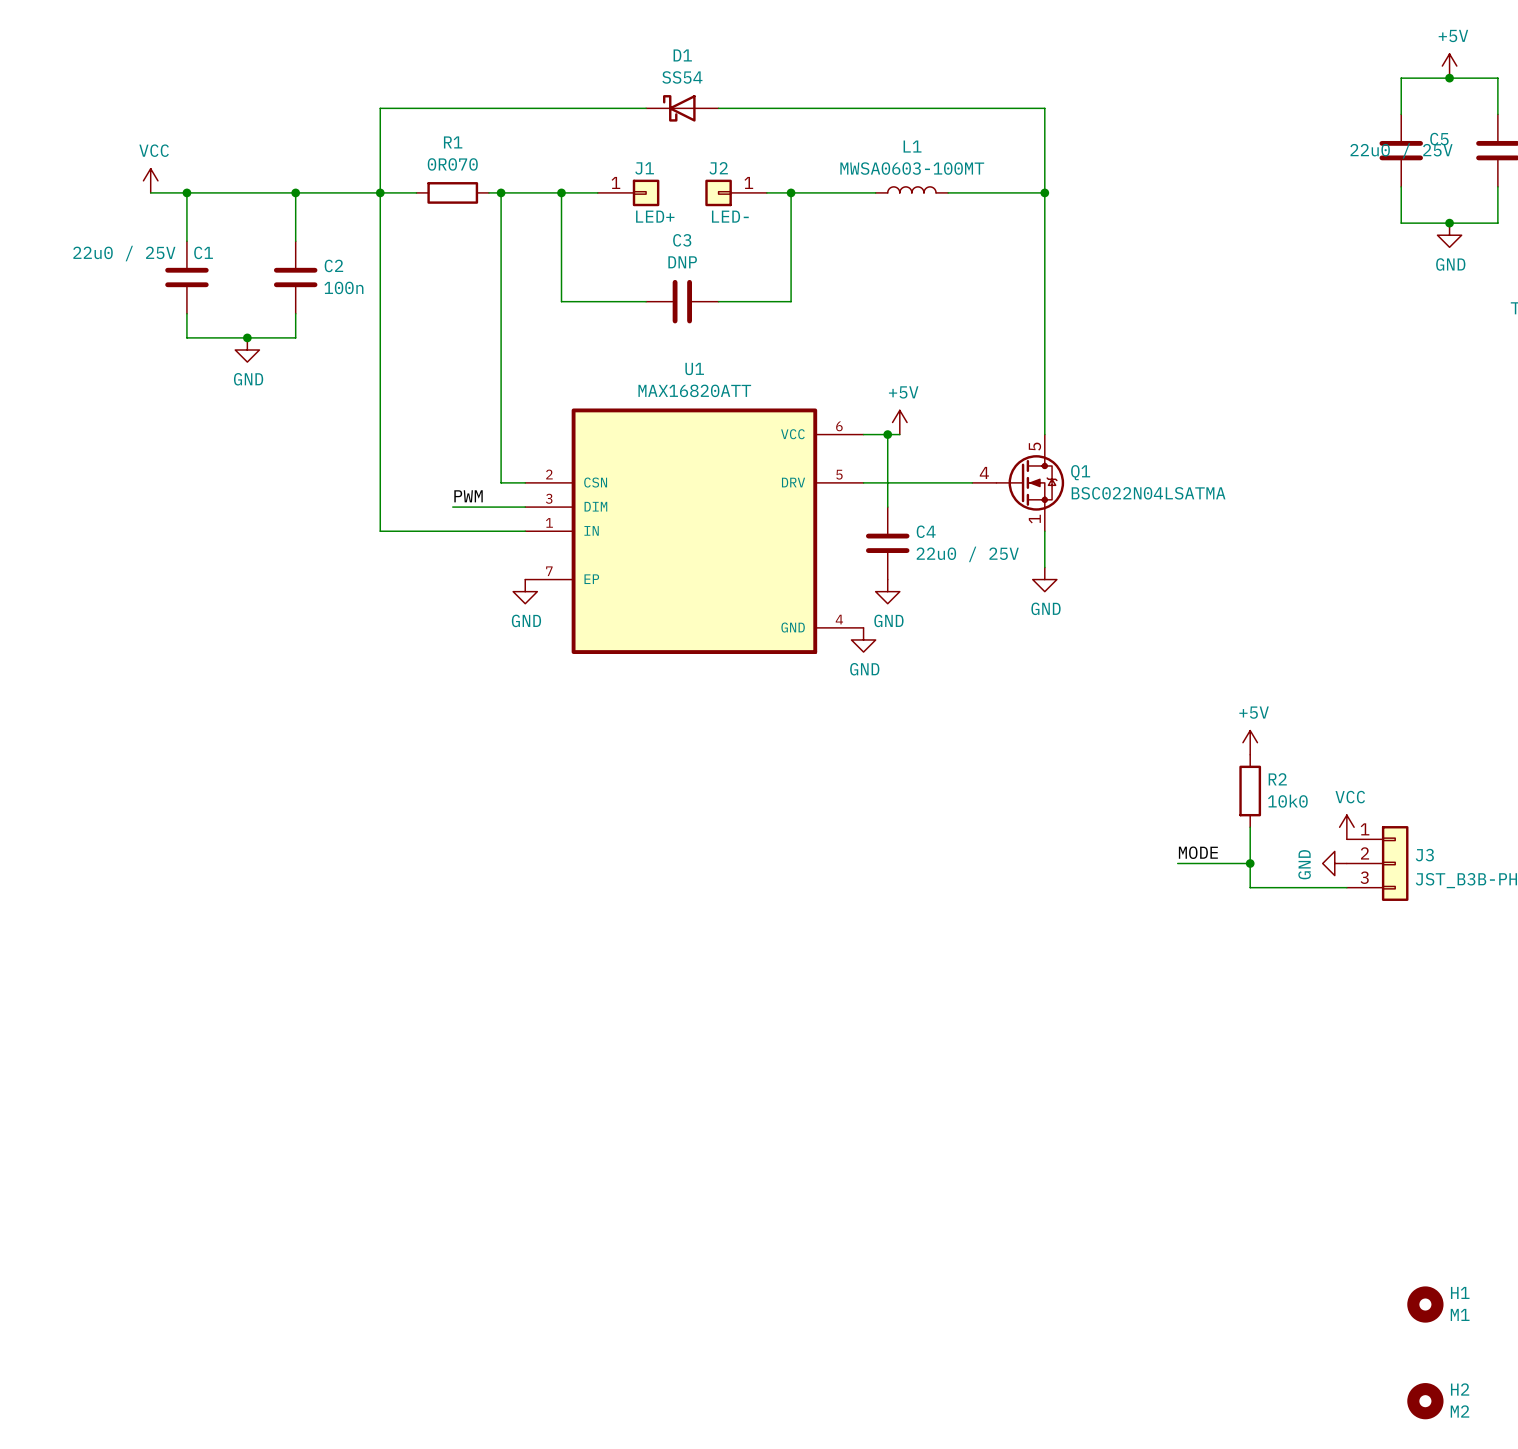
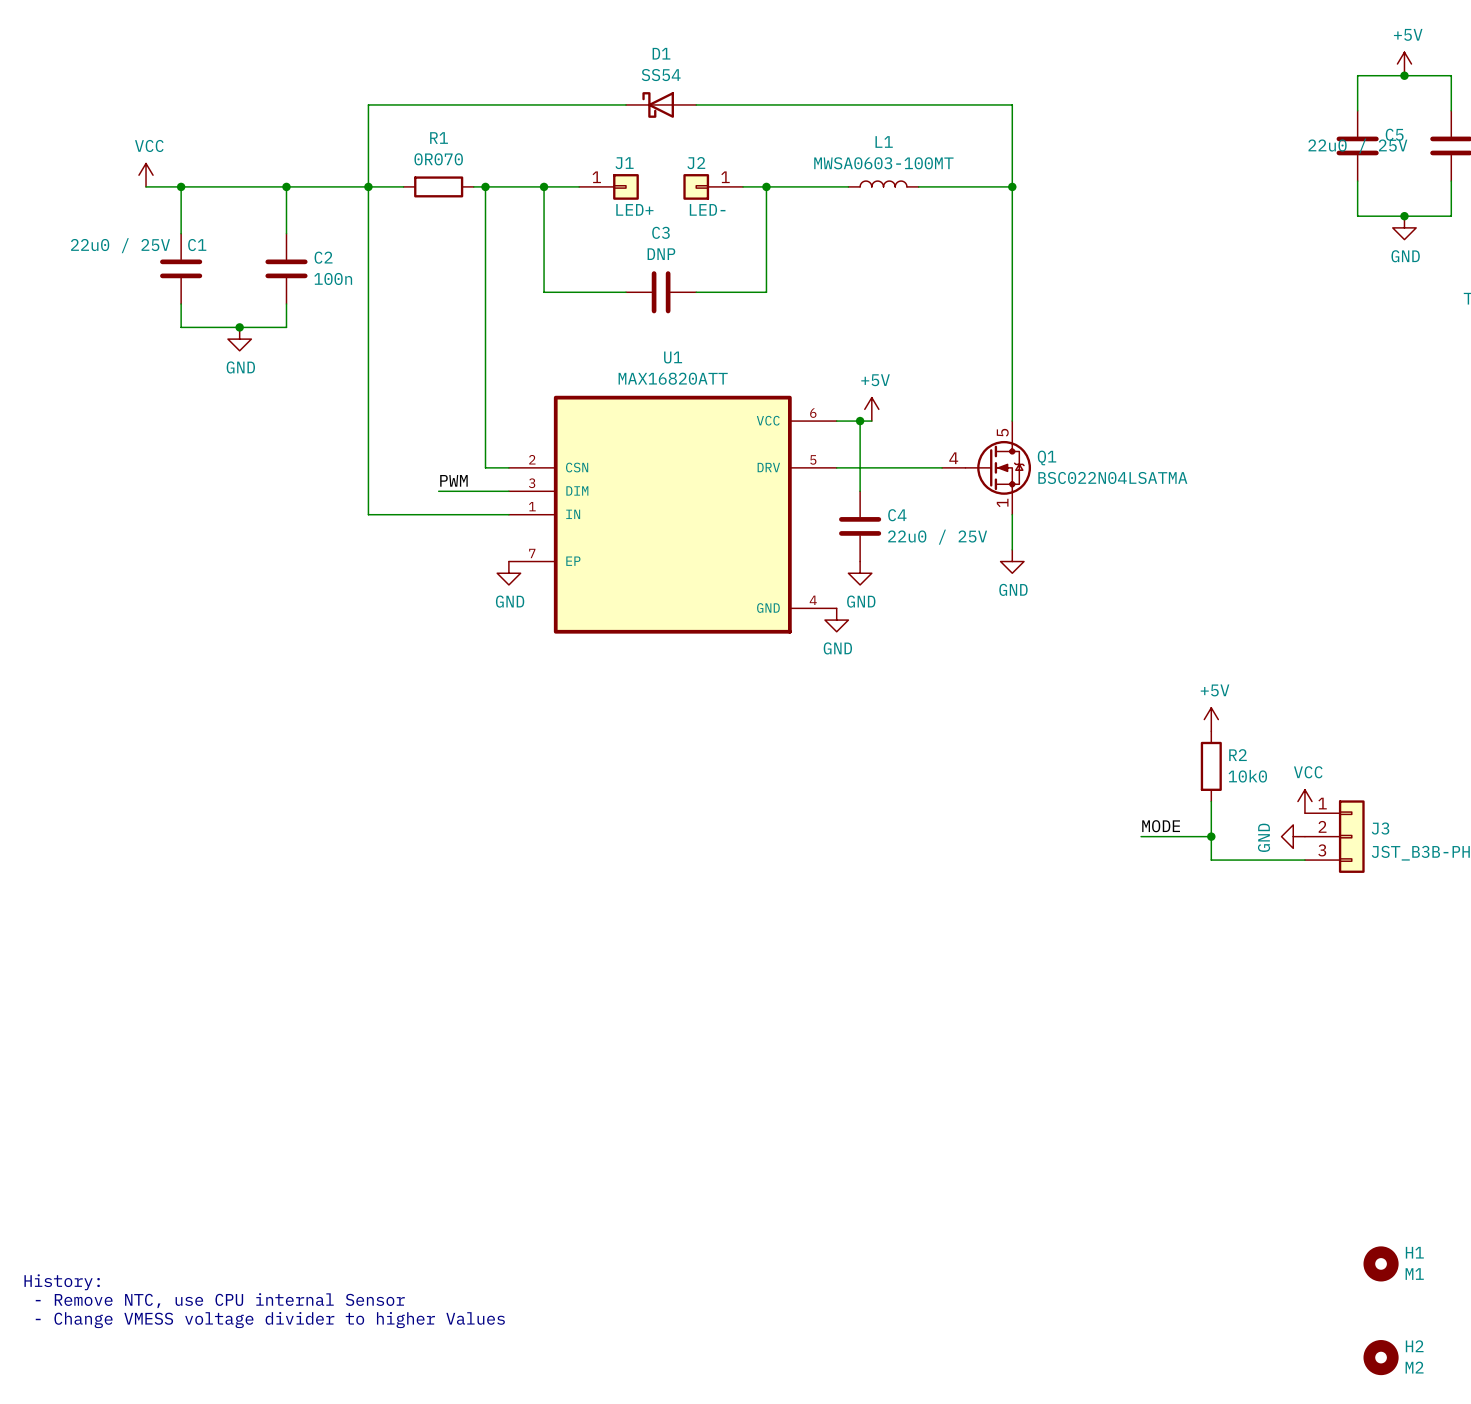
text: none -> History: (62, 1282)
text: none -> - Remove NTC, use CPU internal Sensor (220, 1300)
text: none -> - Change VMESS voltage divider to higher Values (270, 1320)

